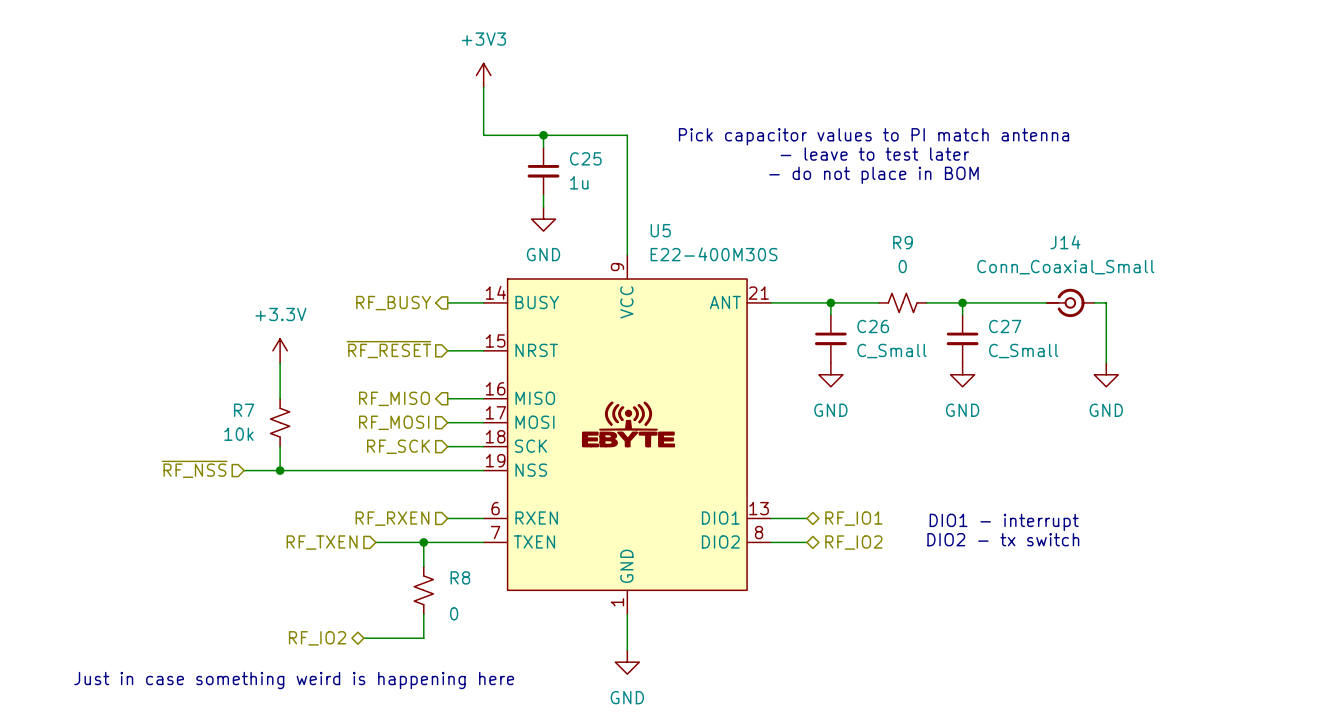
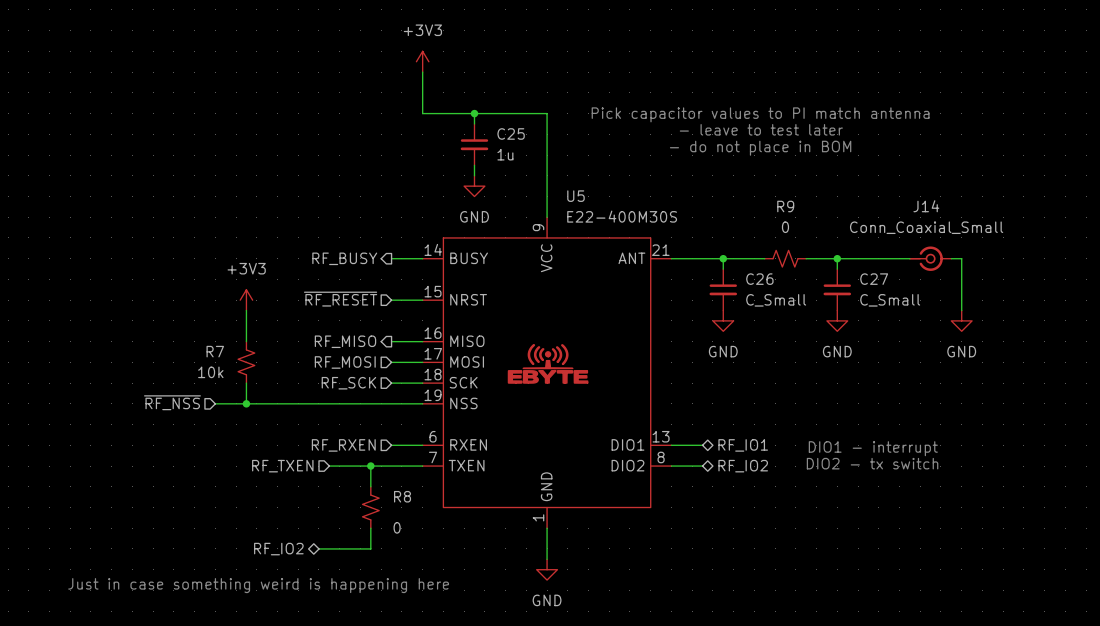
power symbol: +3.3V (280, 350) -> +3V3 (246, 300)

